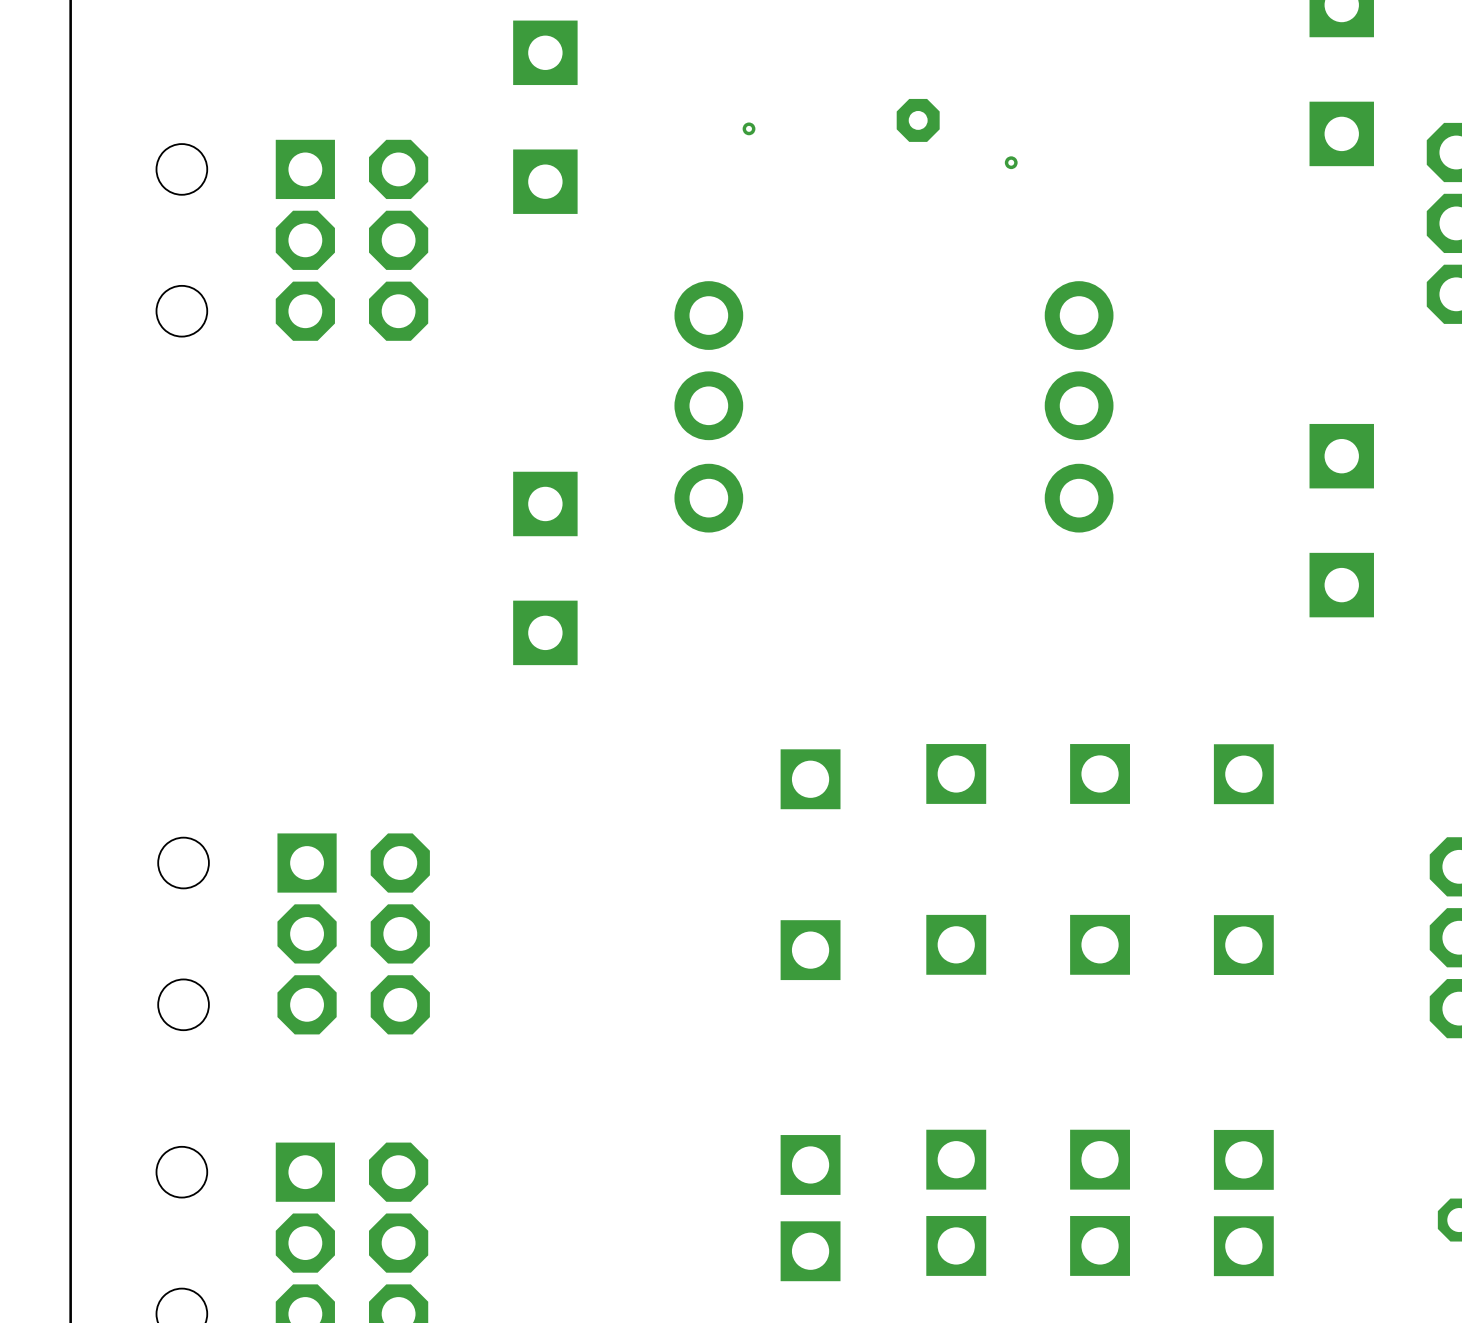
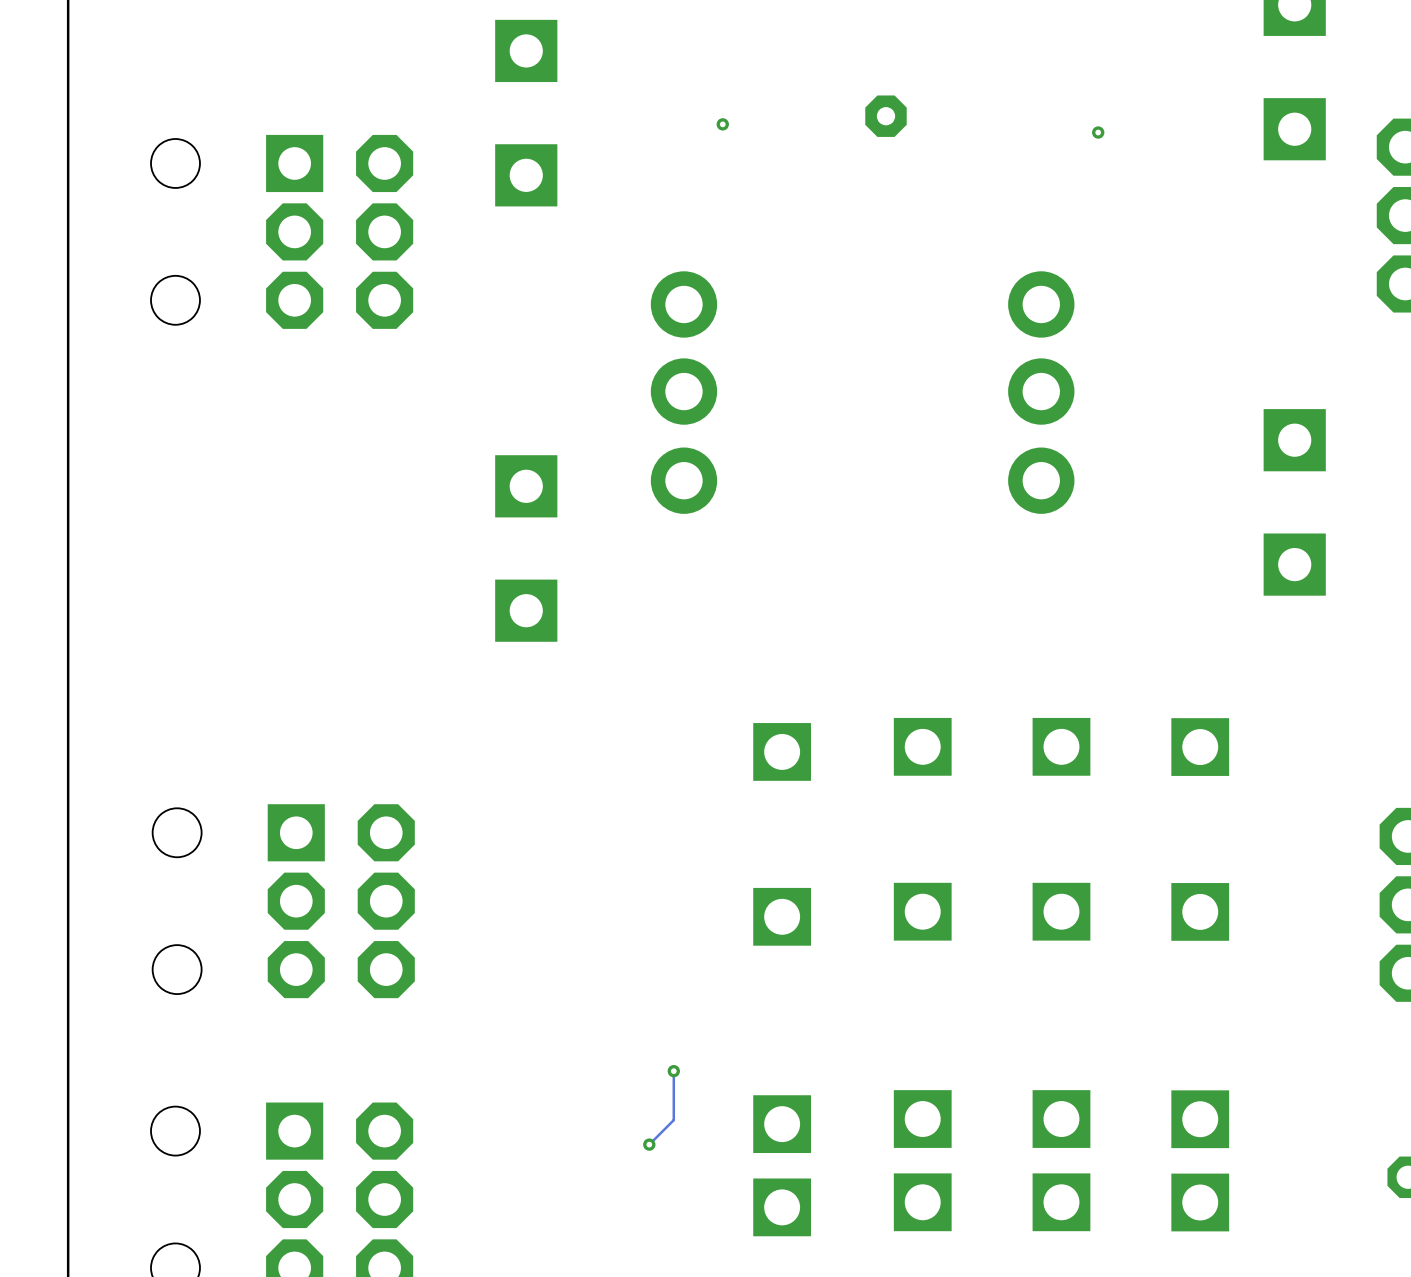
via: none -> (1098, 132)
via: (1011, 162) -> none
track: none -> (673, 1071) (673, 1120) (649, 1144)
via: none -> (673, 1071)
via: none -> (649, 1144)

